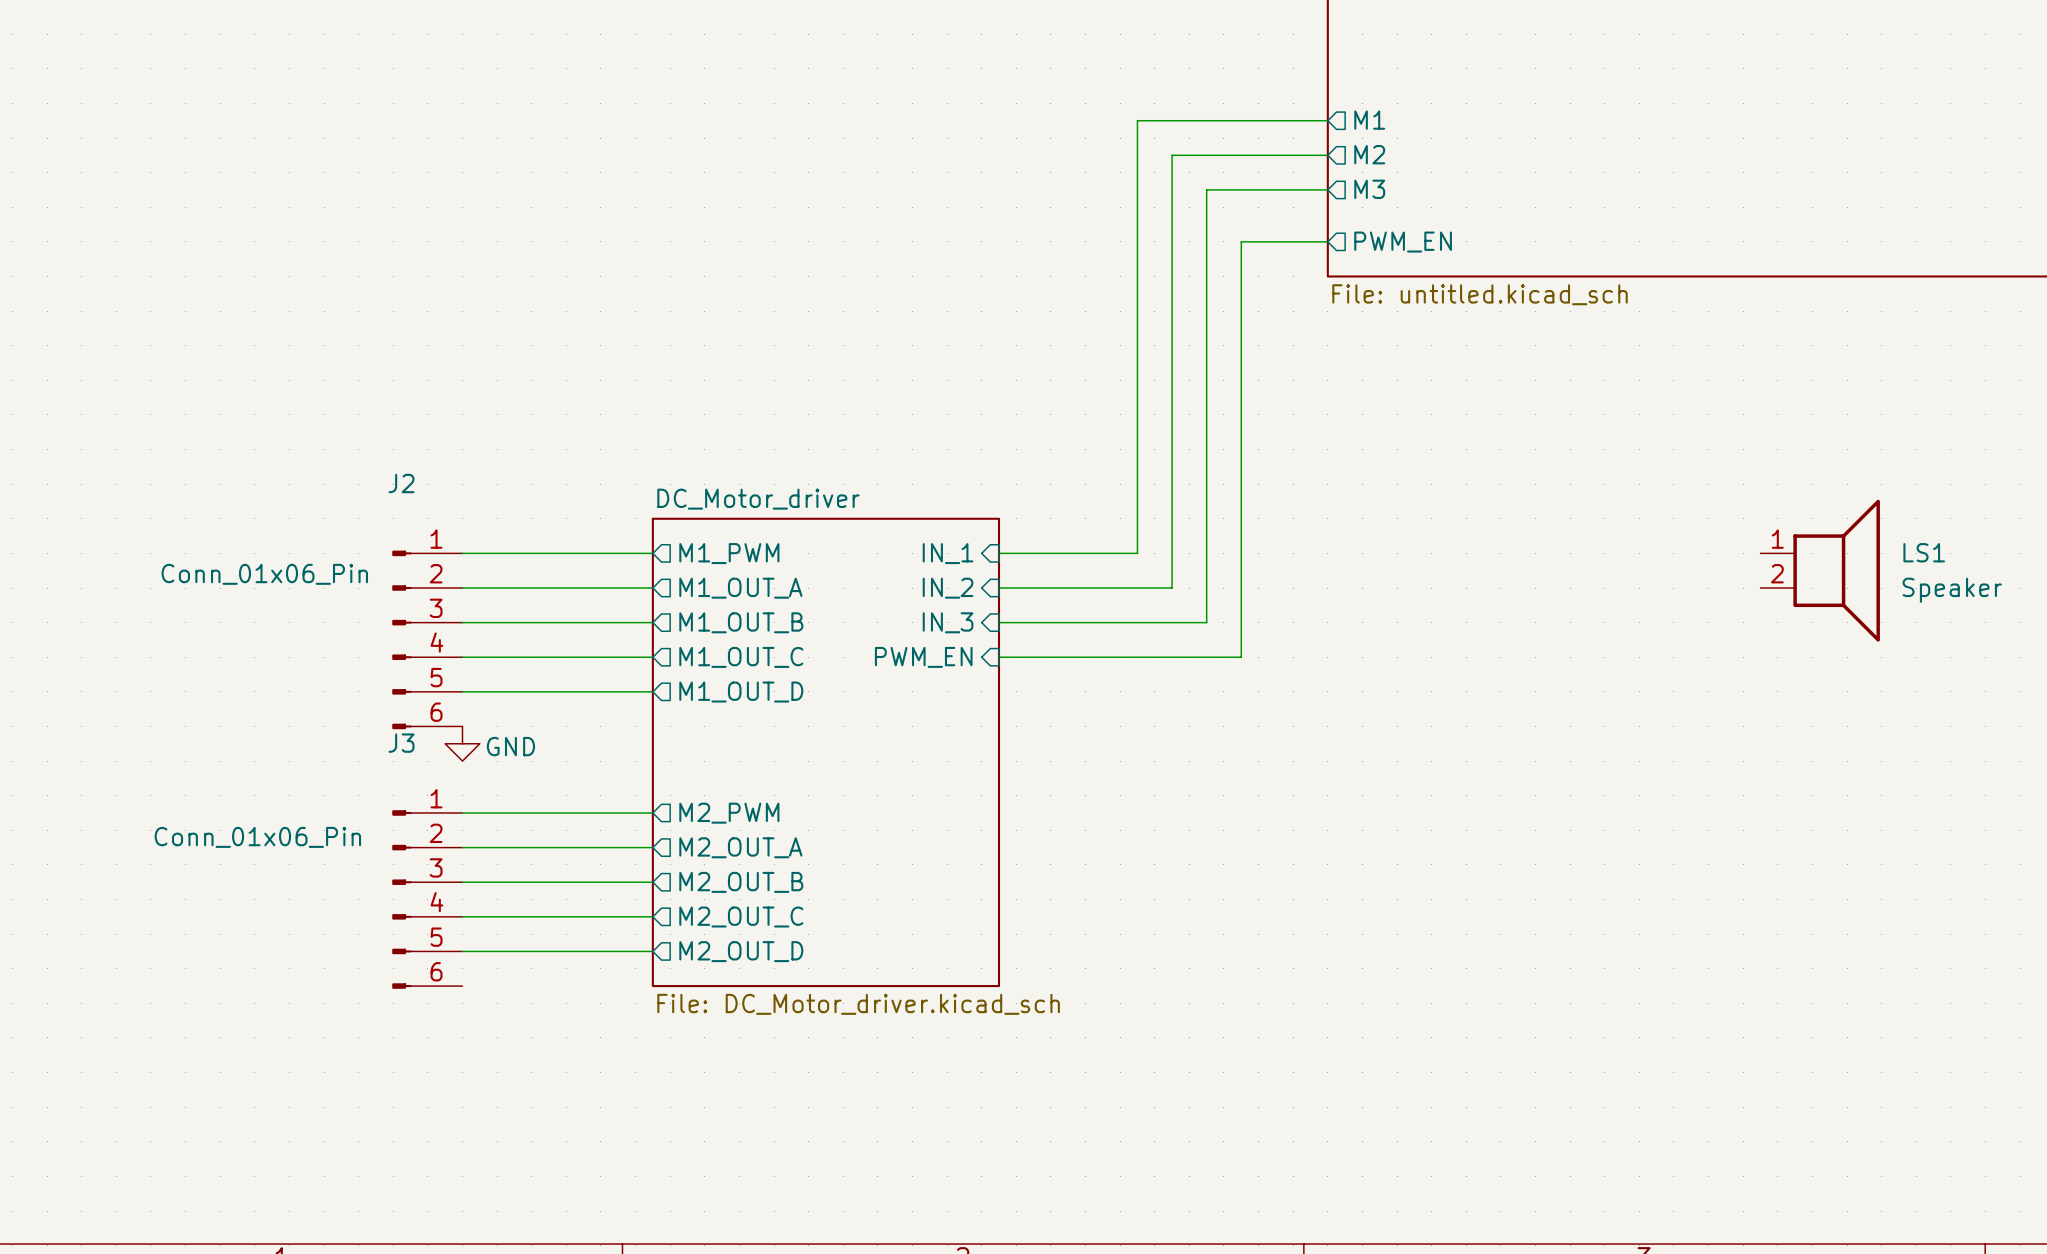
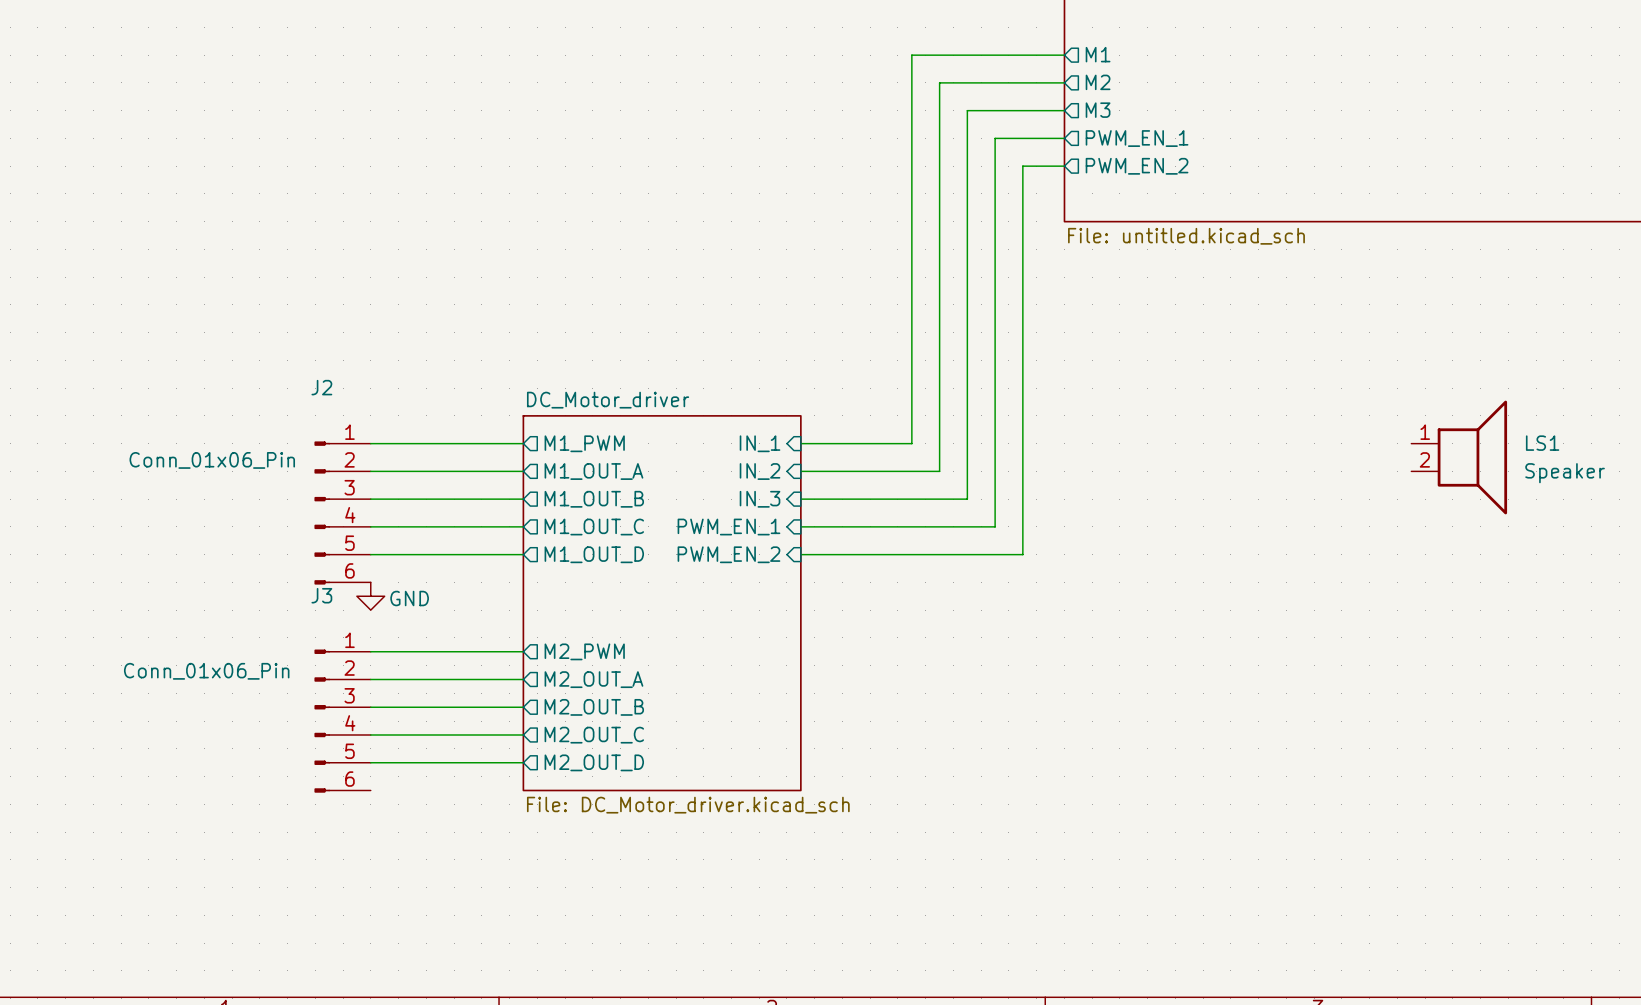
wire: (1137, 120) (1327, 120) -> (911, 96) (911, 55) (1064, 55)
sheet pin position: M1 (1369, 120) -> M1 (1098, 54)
sheet pin position: M2 (1369, 154) -> M2 (1098, 82)
wire: (1172, 155) (1327, 155) -> (939, 124) (939, 82) (1064, 82)
sheet pin: none -> PWM_EN_1 (1137, 138)
wire: (1206, 189) (1327, 189) -> (967, 152) (967, 110) (1064, 110)
sheet pin position: M3 (1369, 189) -> M3 (1098, 110)
wire: none -> (1064, 166) (1022, 166) (1022, 554) (800, 554)
wire: (1241, 241) (1327, 241) -> (995, 193) (995, 138) (1064, 138)
sheet pin: PWM_EN (1403, 242) -> PWM_EN_2 (1137, 166)
sheet pin: PWM_EN (923, 657) -> PWM_EN_1 (728, 527)
sheet pin: none -> PWM_EN_2 (728, 554)

